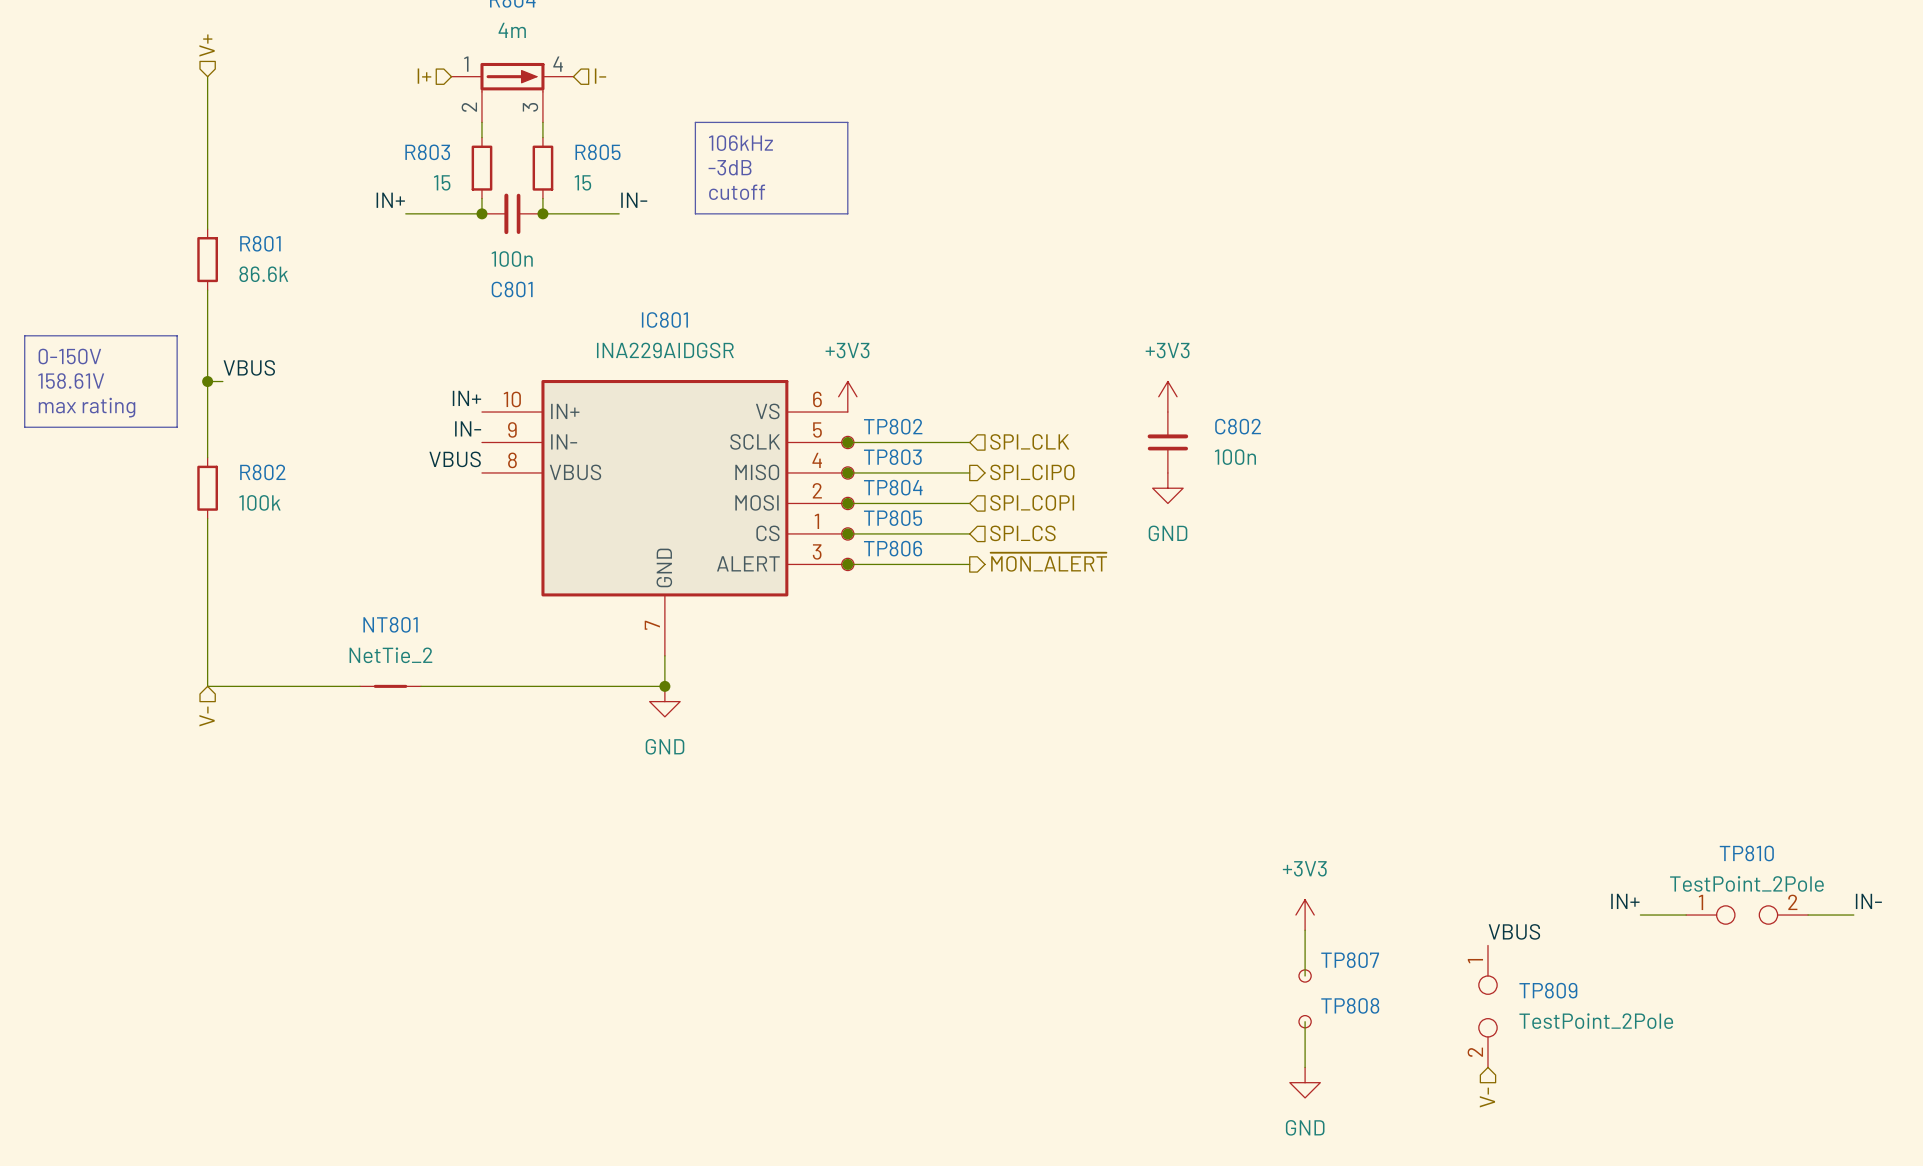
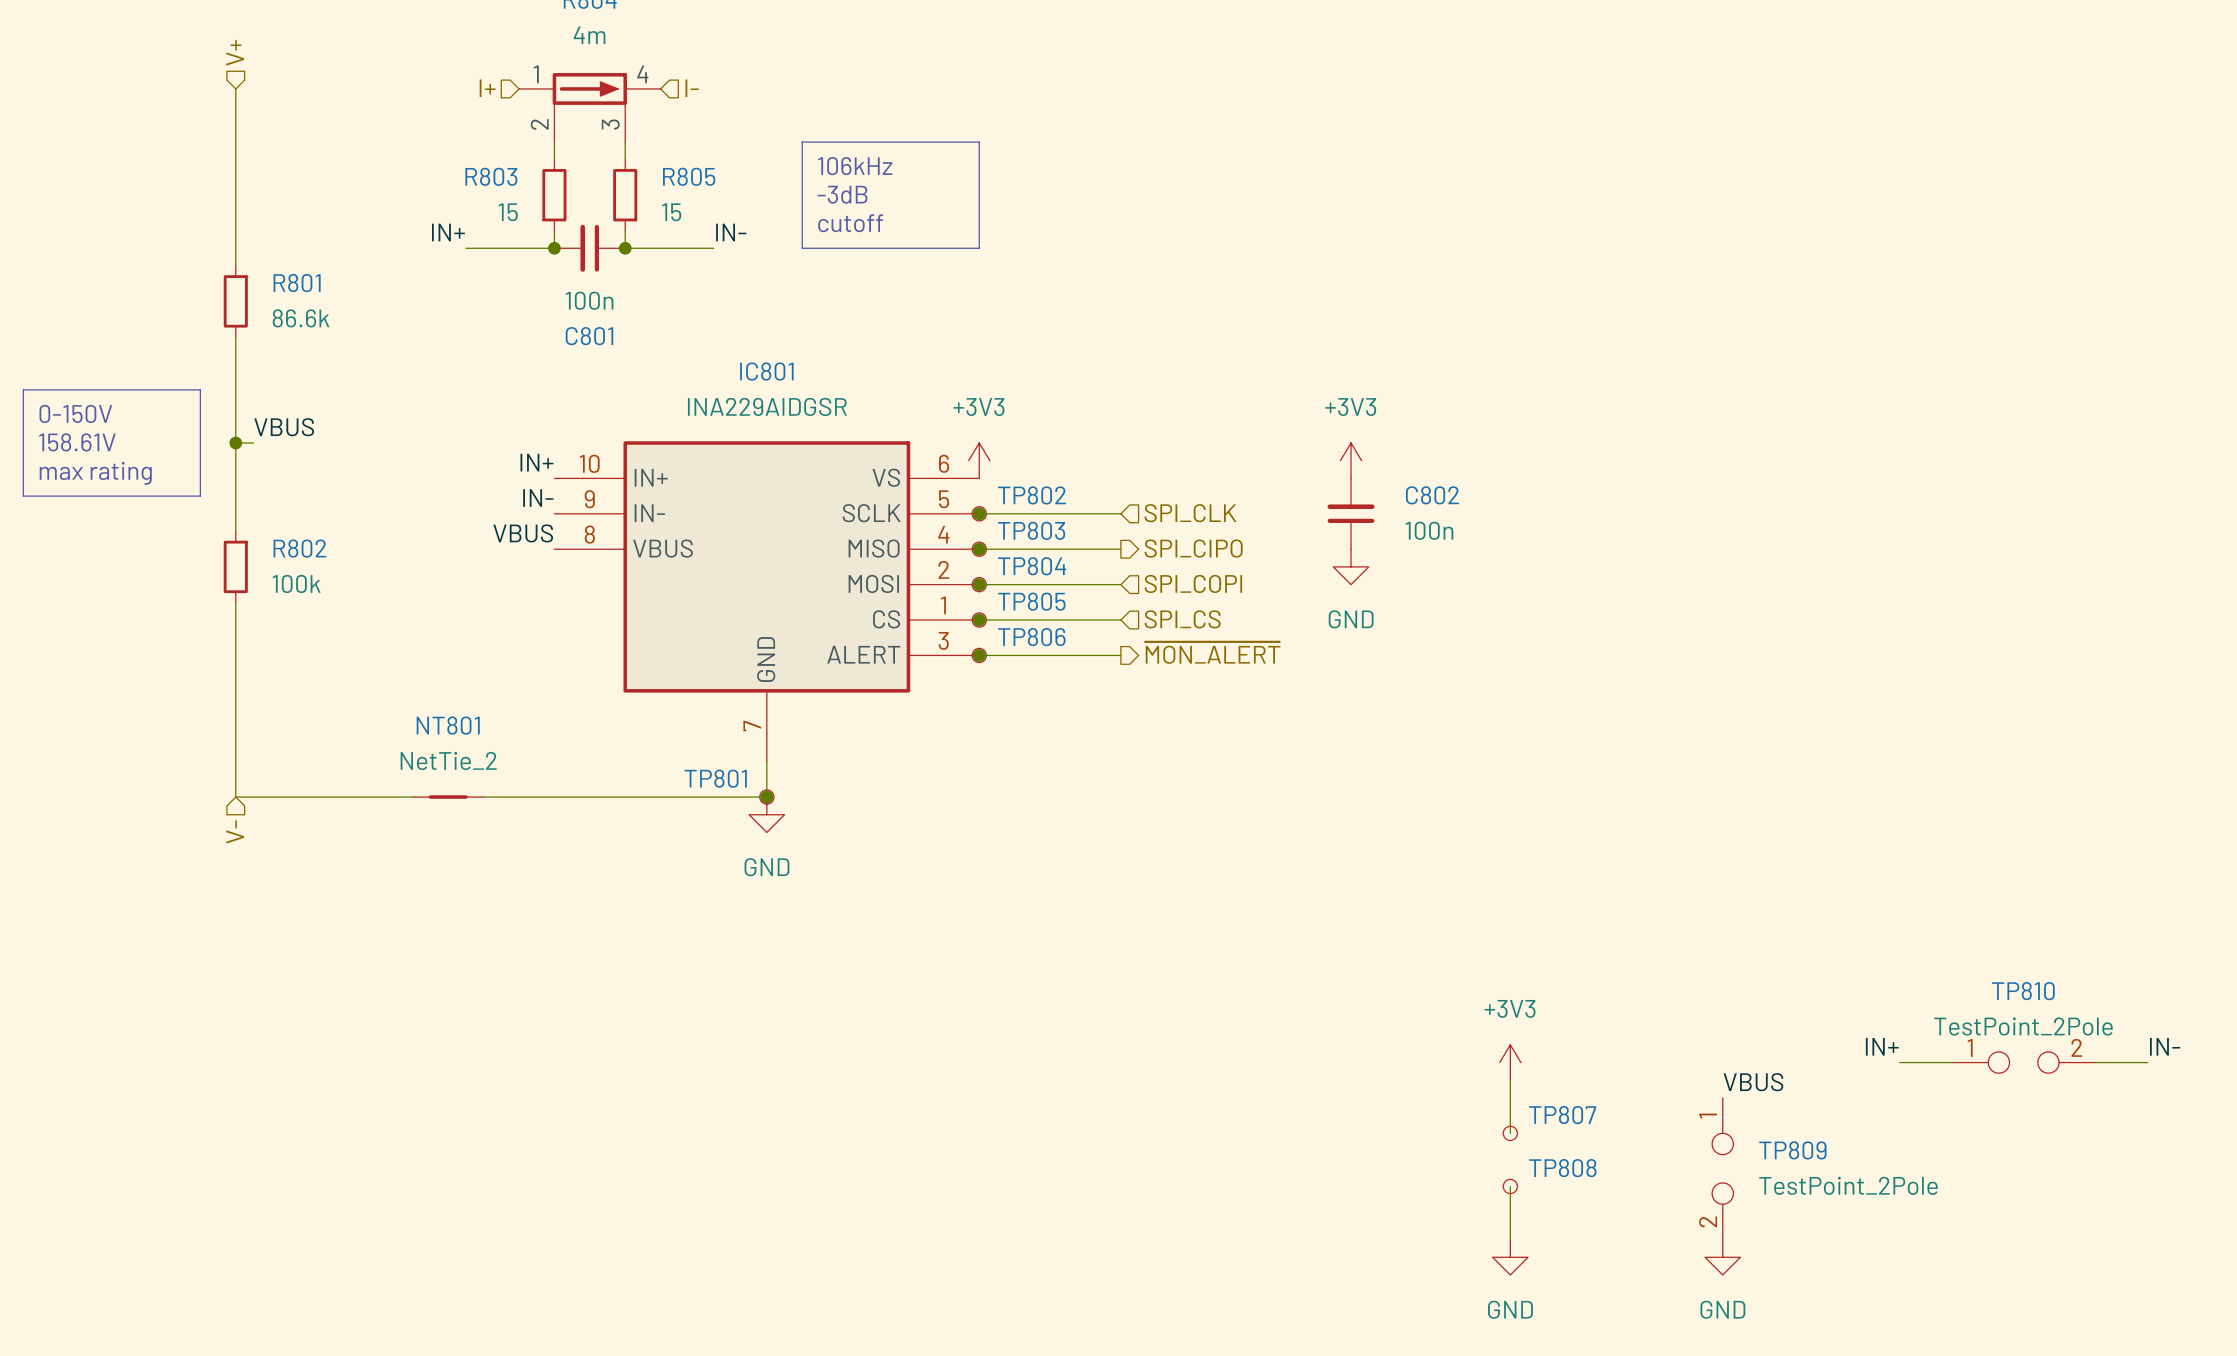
TP801: none -> (766, 797)
power symbol: none -> GND (1722, 1257)
hierarchical label: V- (1487, 1097) -> none

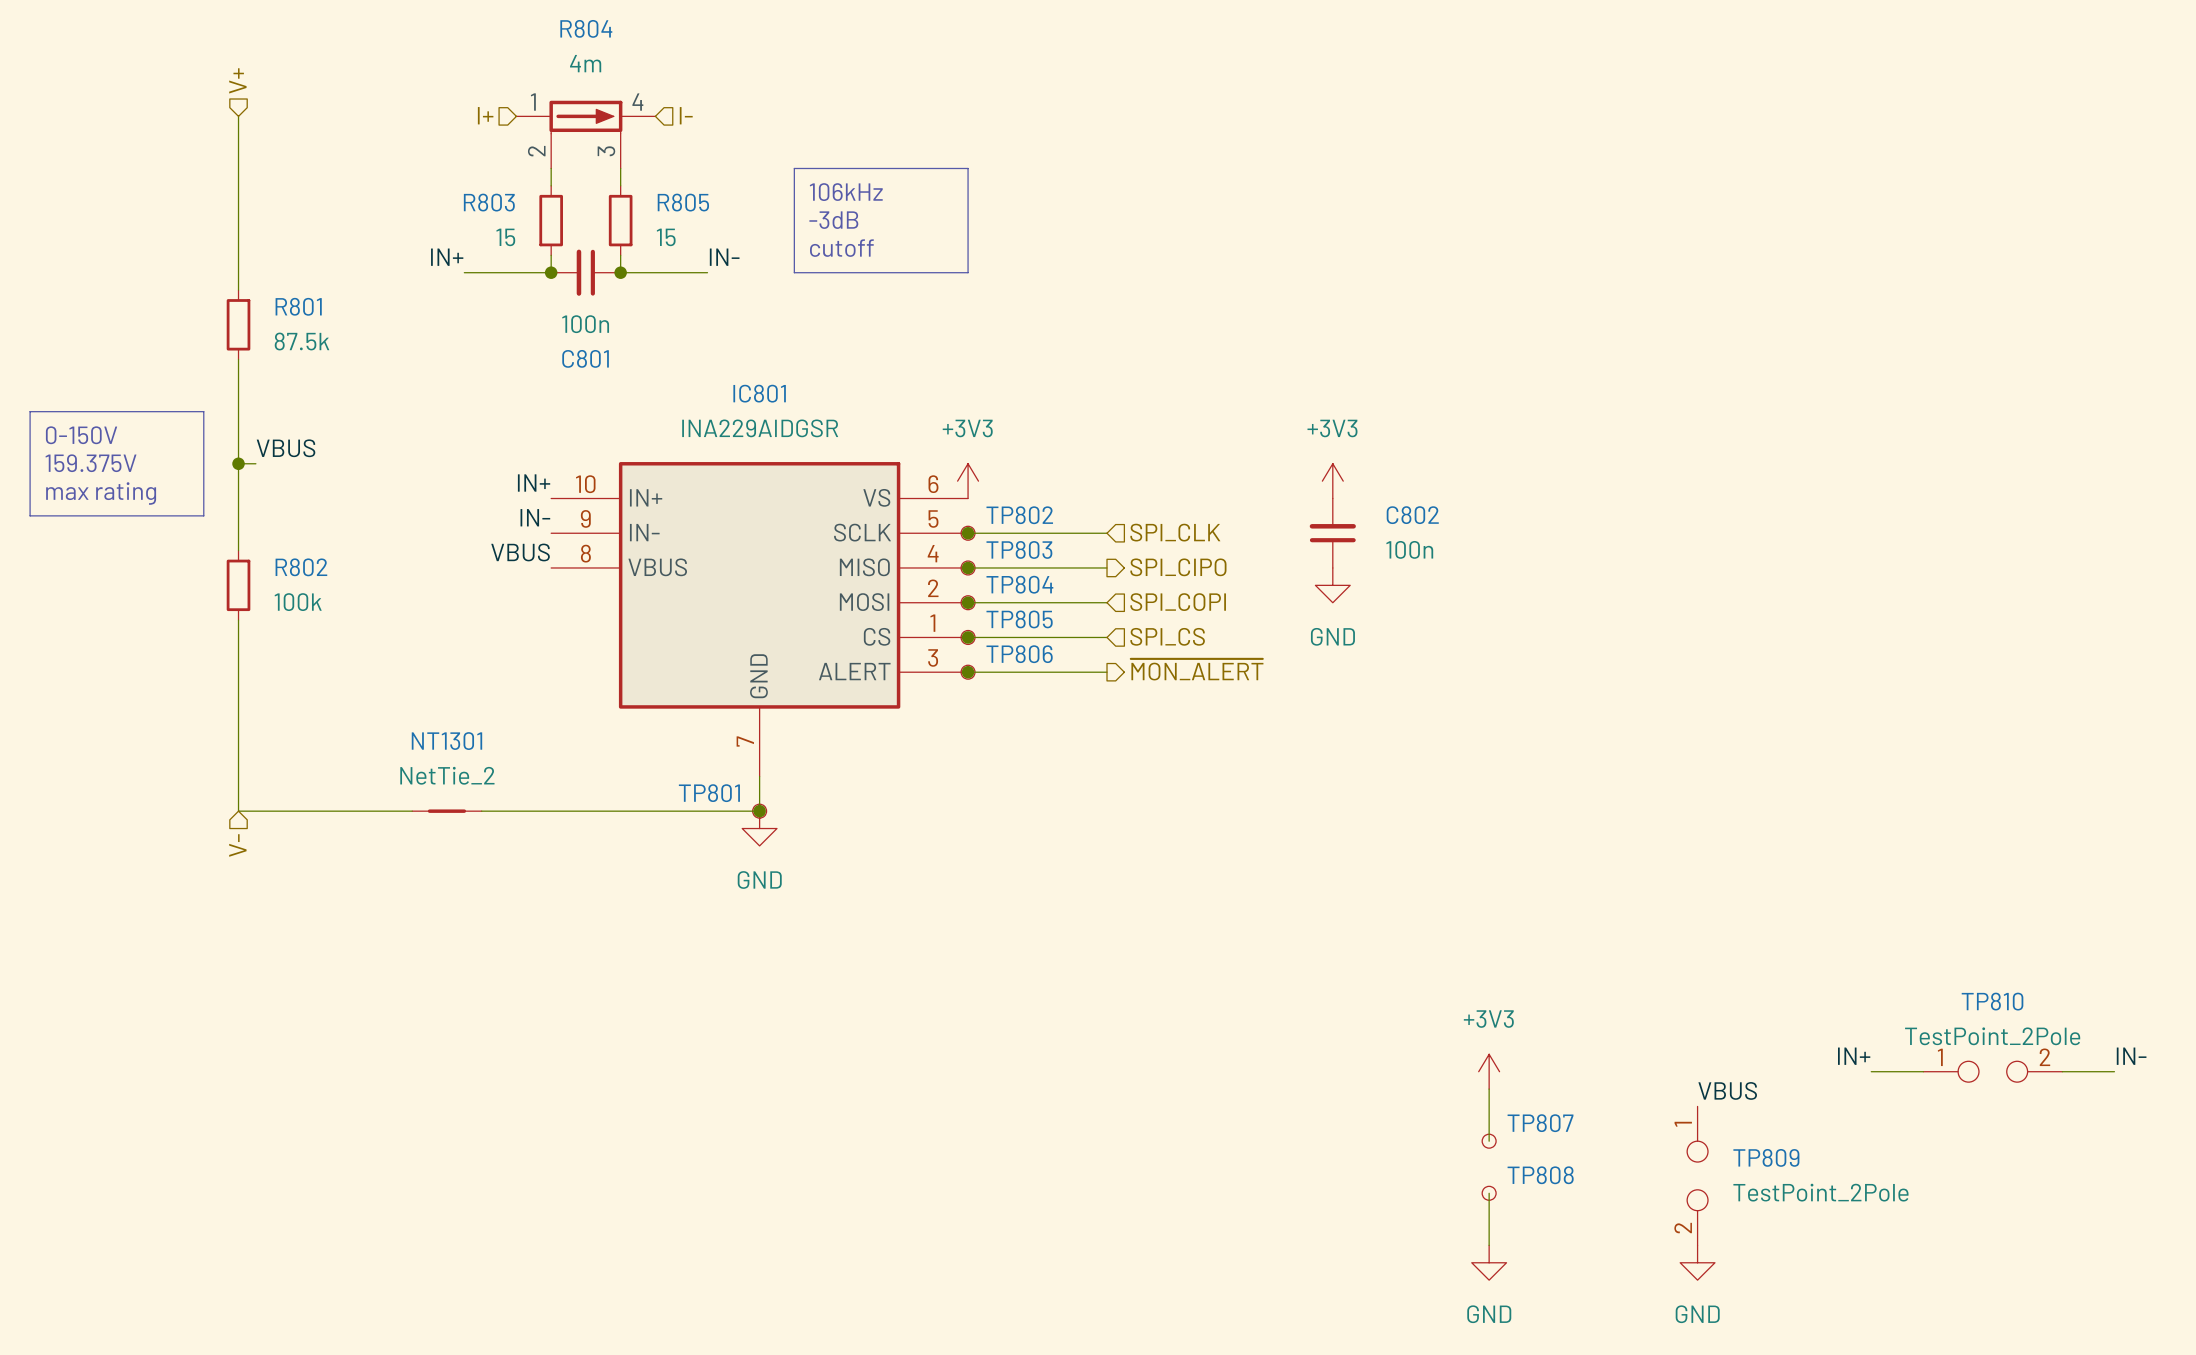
R801 value: 86.6k (301, 318) -> 87.5k (301, 341)
text: 158.61V (77, 442) -> 159.375V (91, 463)
NT801 name: NT801 (448, 725) -> NT1301 (446, 741)

